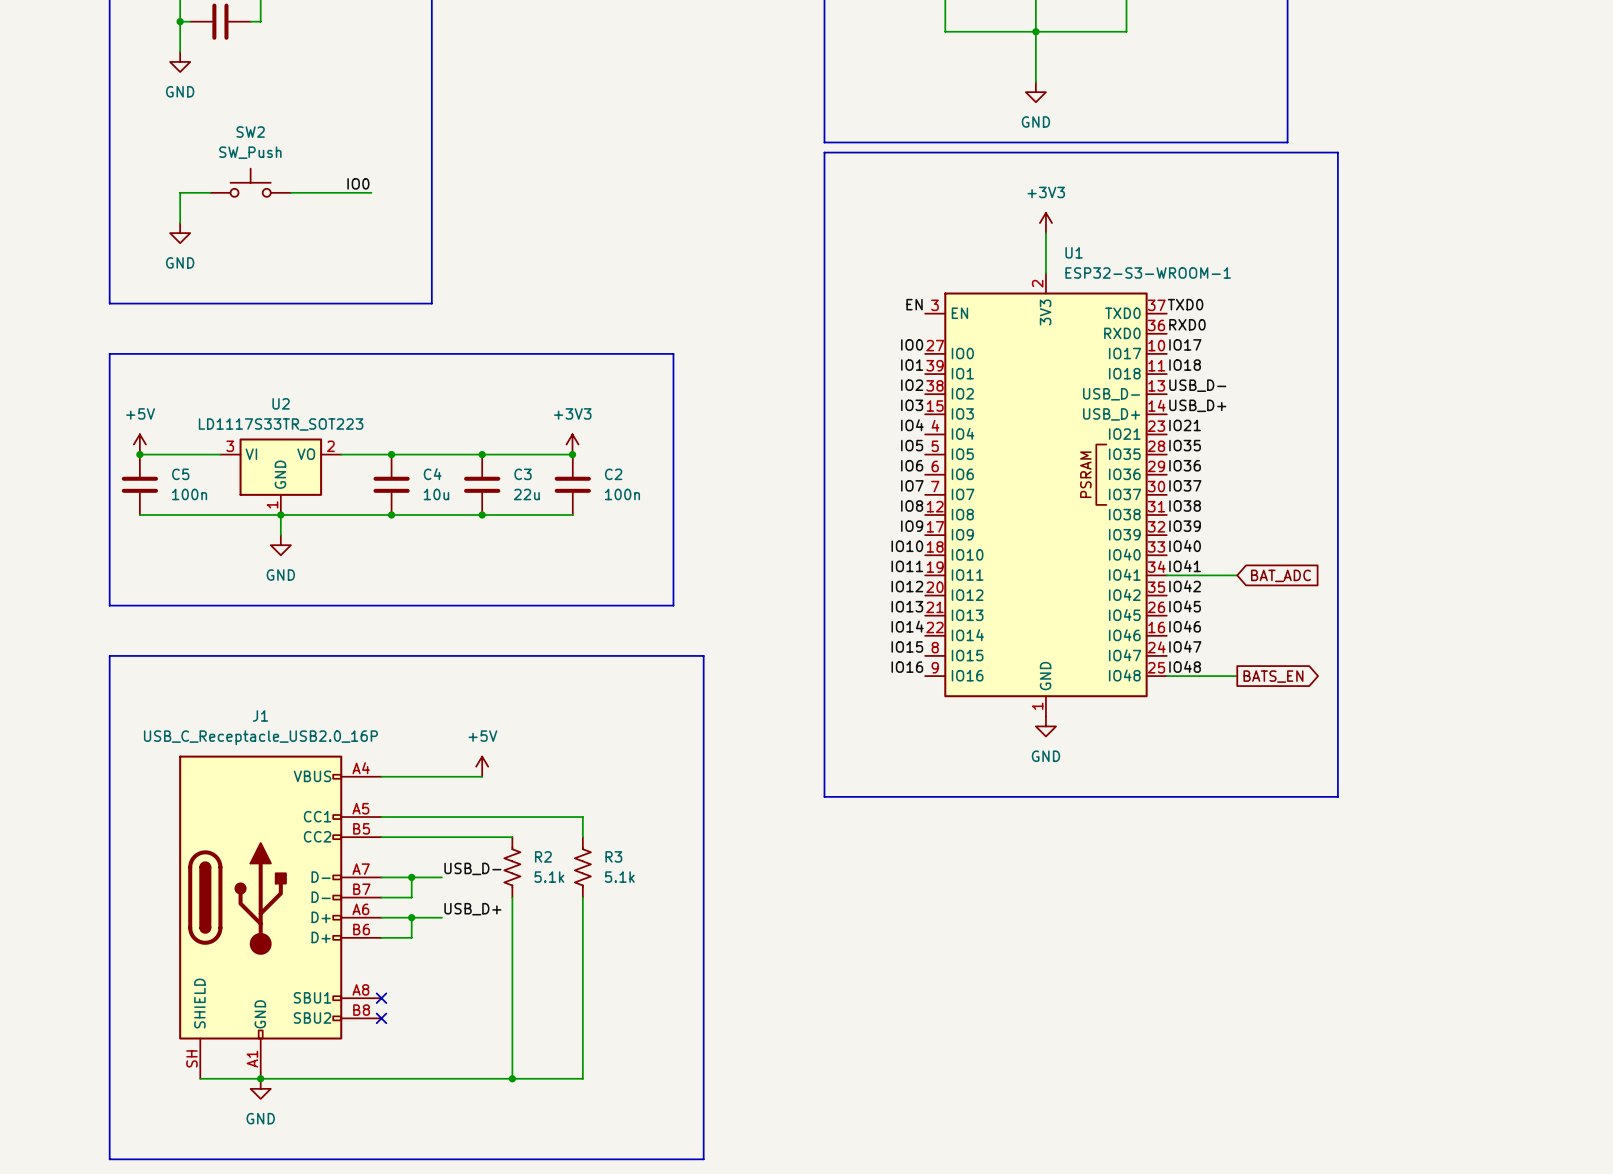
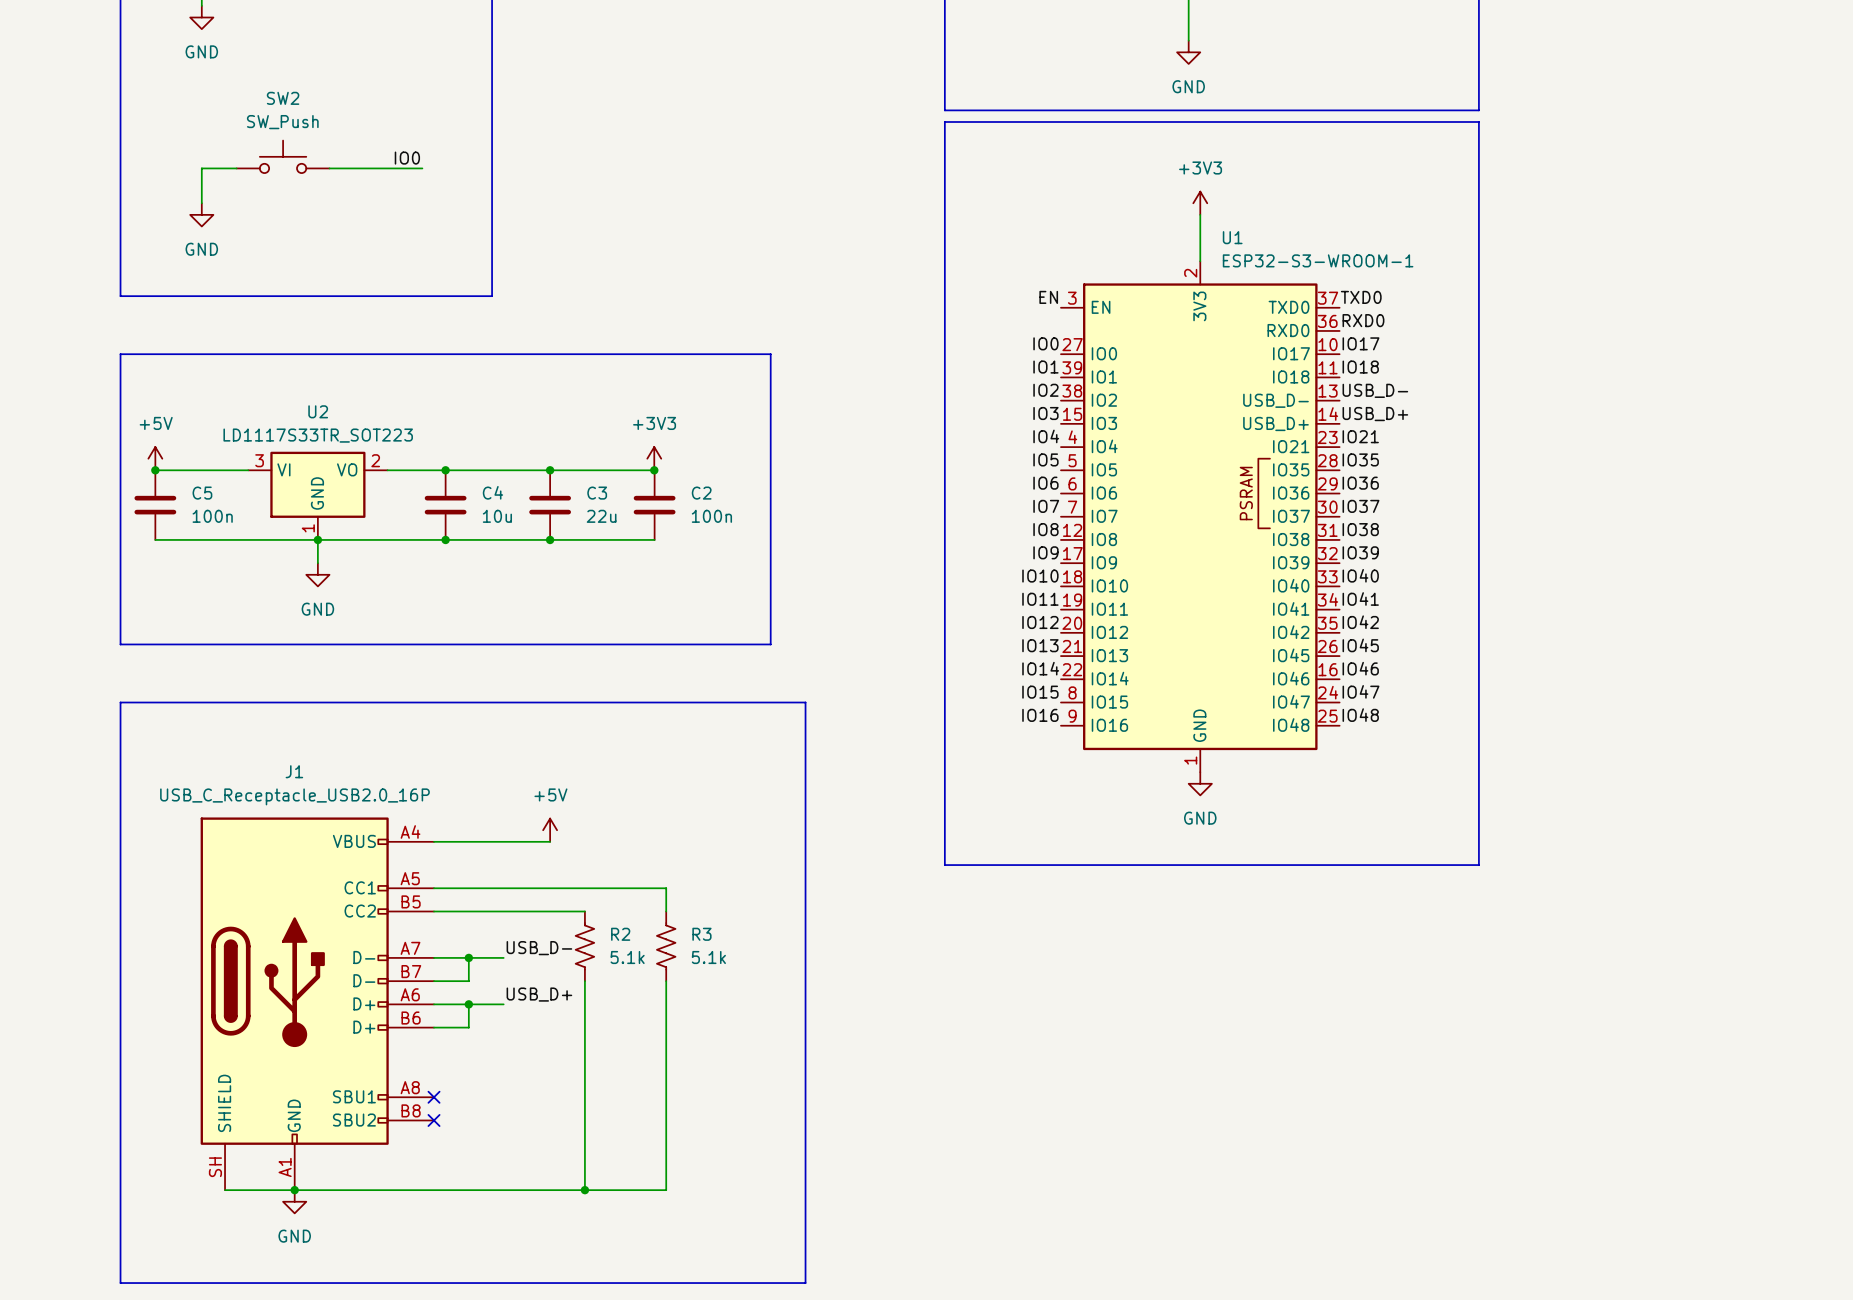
line: (1287, 152) (1337, 152) (1337, 796) (1287, 796) -> (1478, 121) (1478, 865)
wire: (1166, 575) (1237, 575) -> none
global label: BAT_ADC (1281, 575) -> none
wire: (1166, 676) (1237, 676) -> none
global label: BATS_EN (1273, 676) -> none

